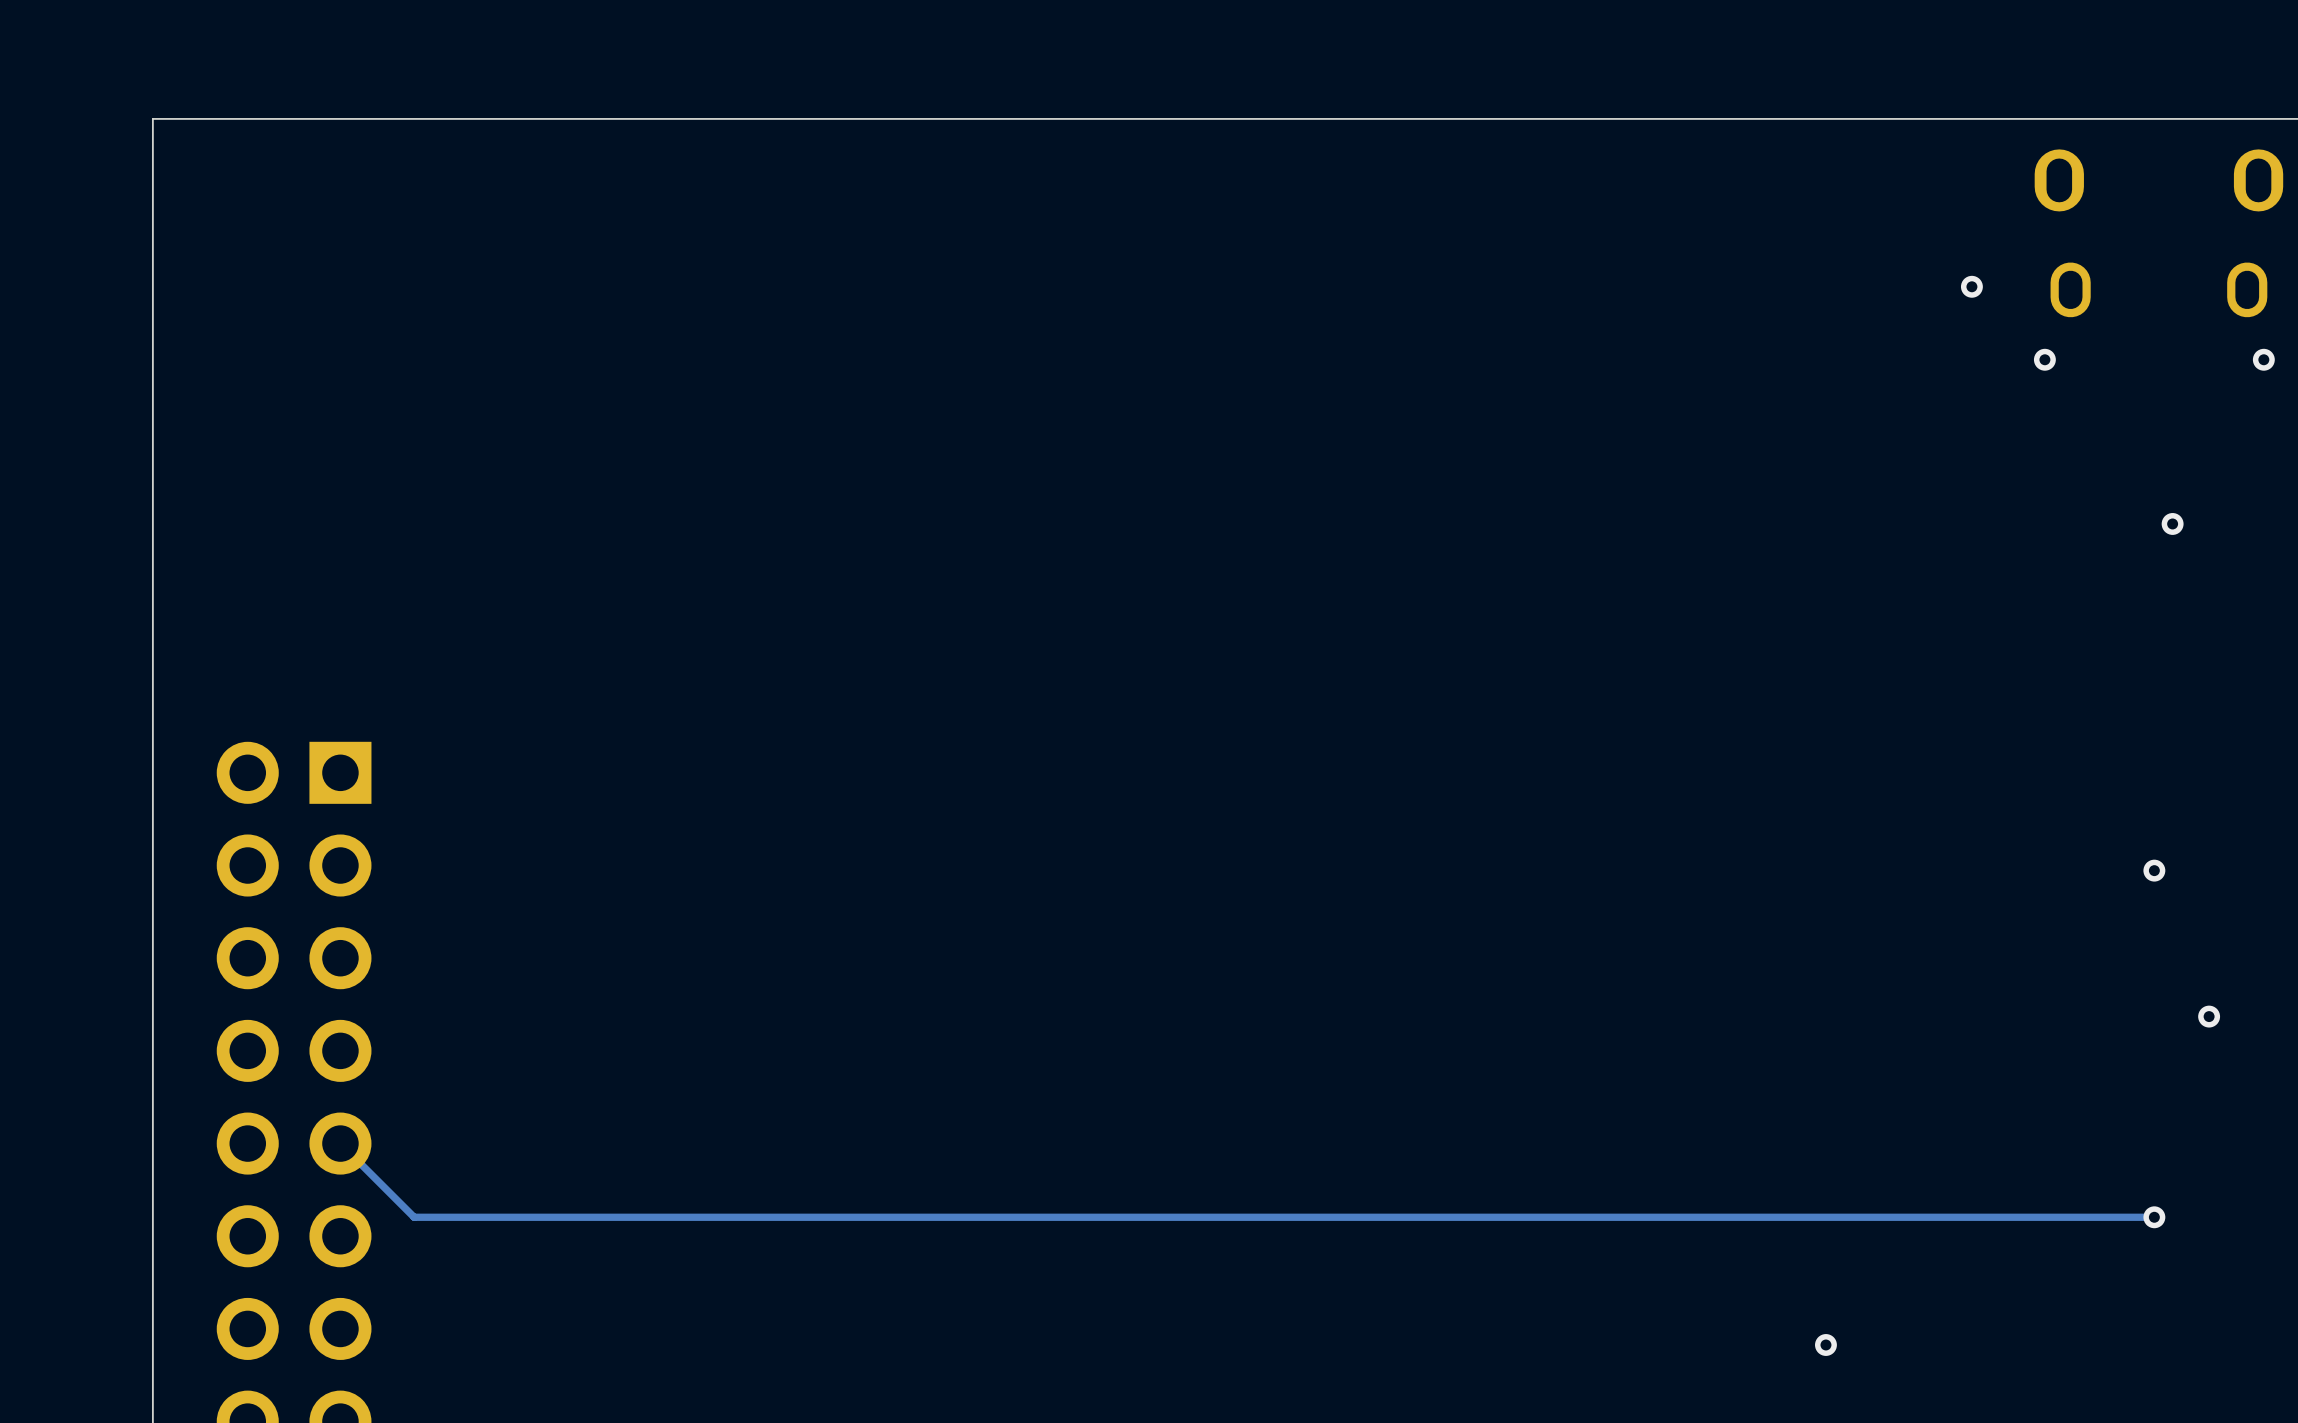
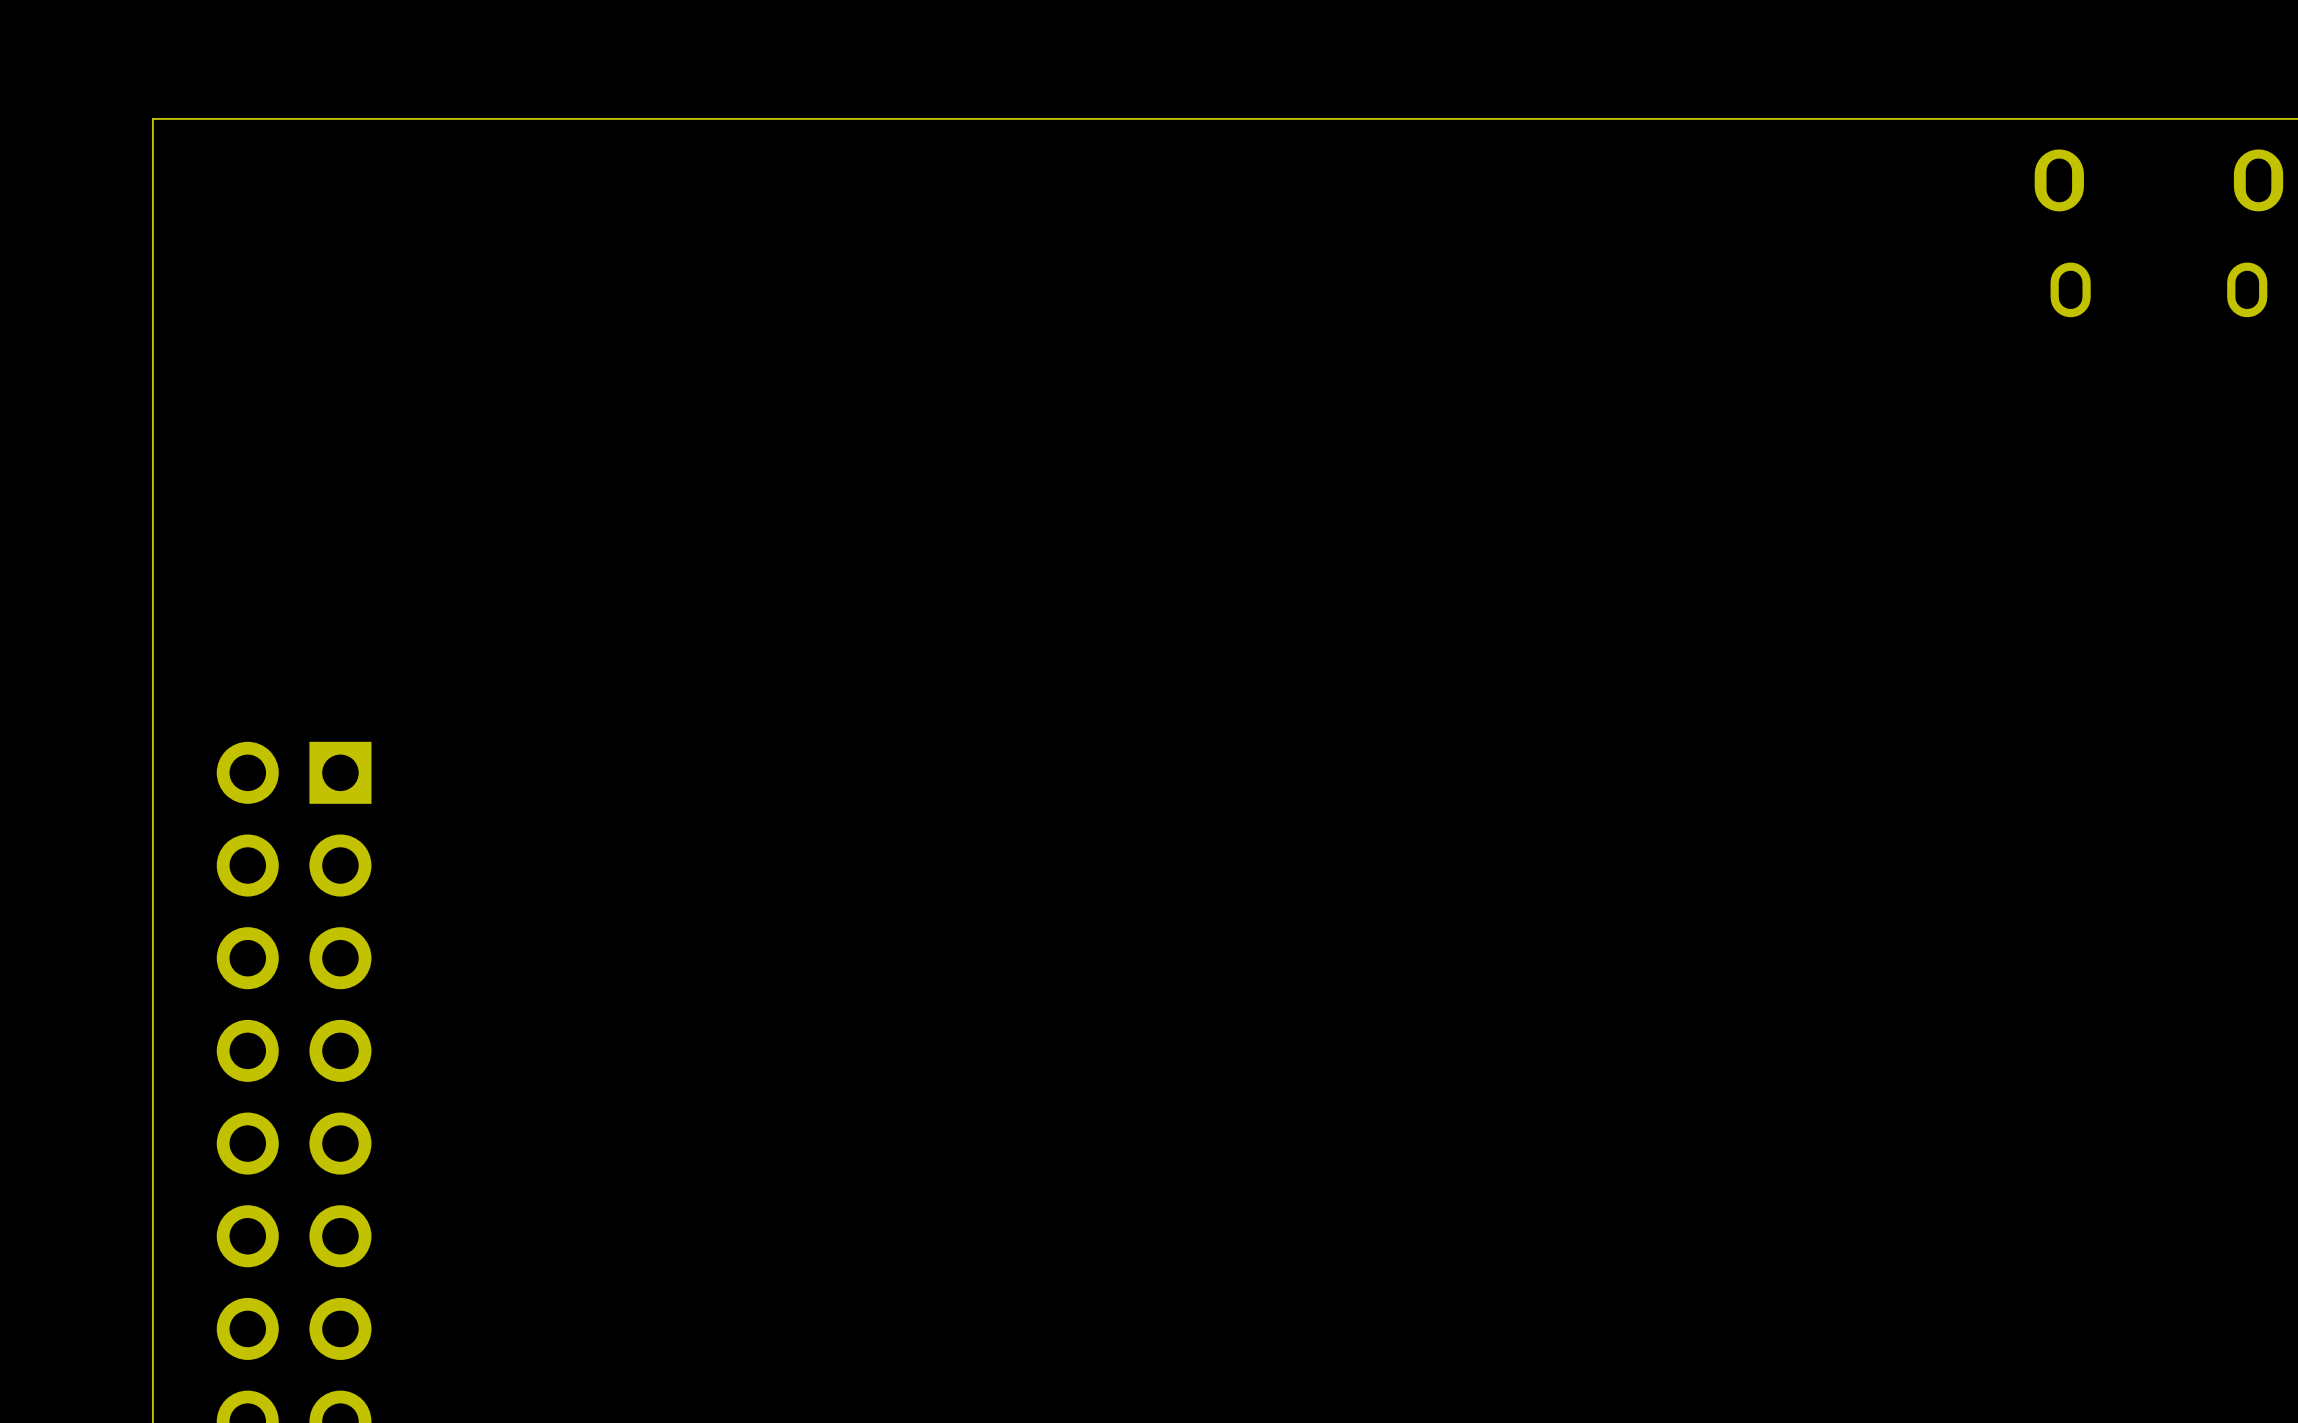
via: (1971, 286) -> none
via: (2044, 359) -> none
via: (2263, 359) -> none
via: (2172, 523) -> none
via: (2154, 870) -> none
via: (2209, 1016) -> none
track: (340, 1143) (414, 1217) (2154, 1217) -> none
via: (2154, 1217) -> none
via: (1825, 1344) -> none

